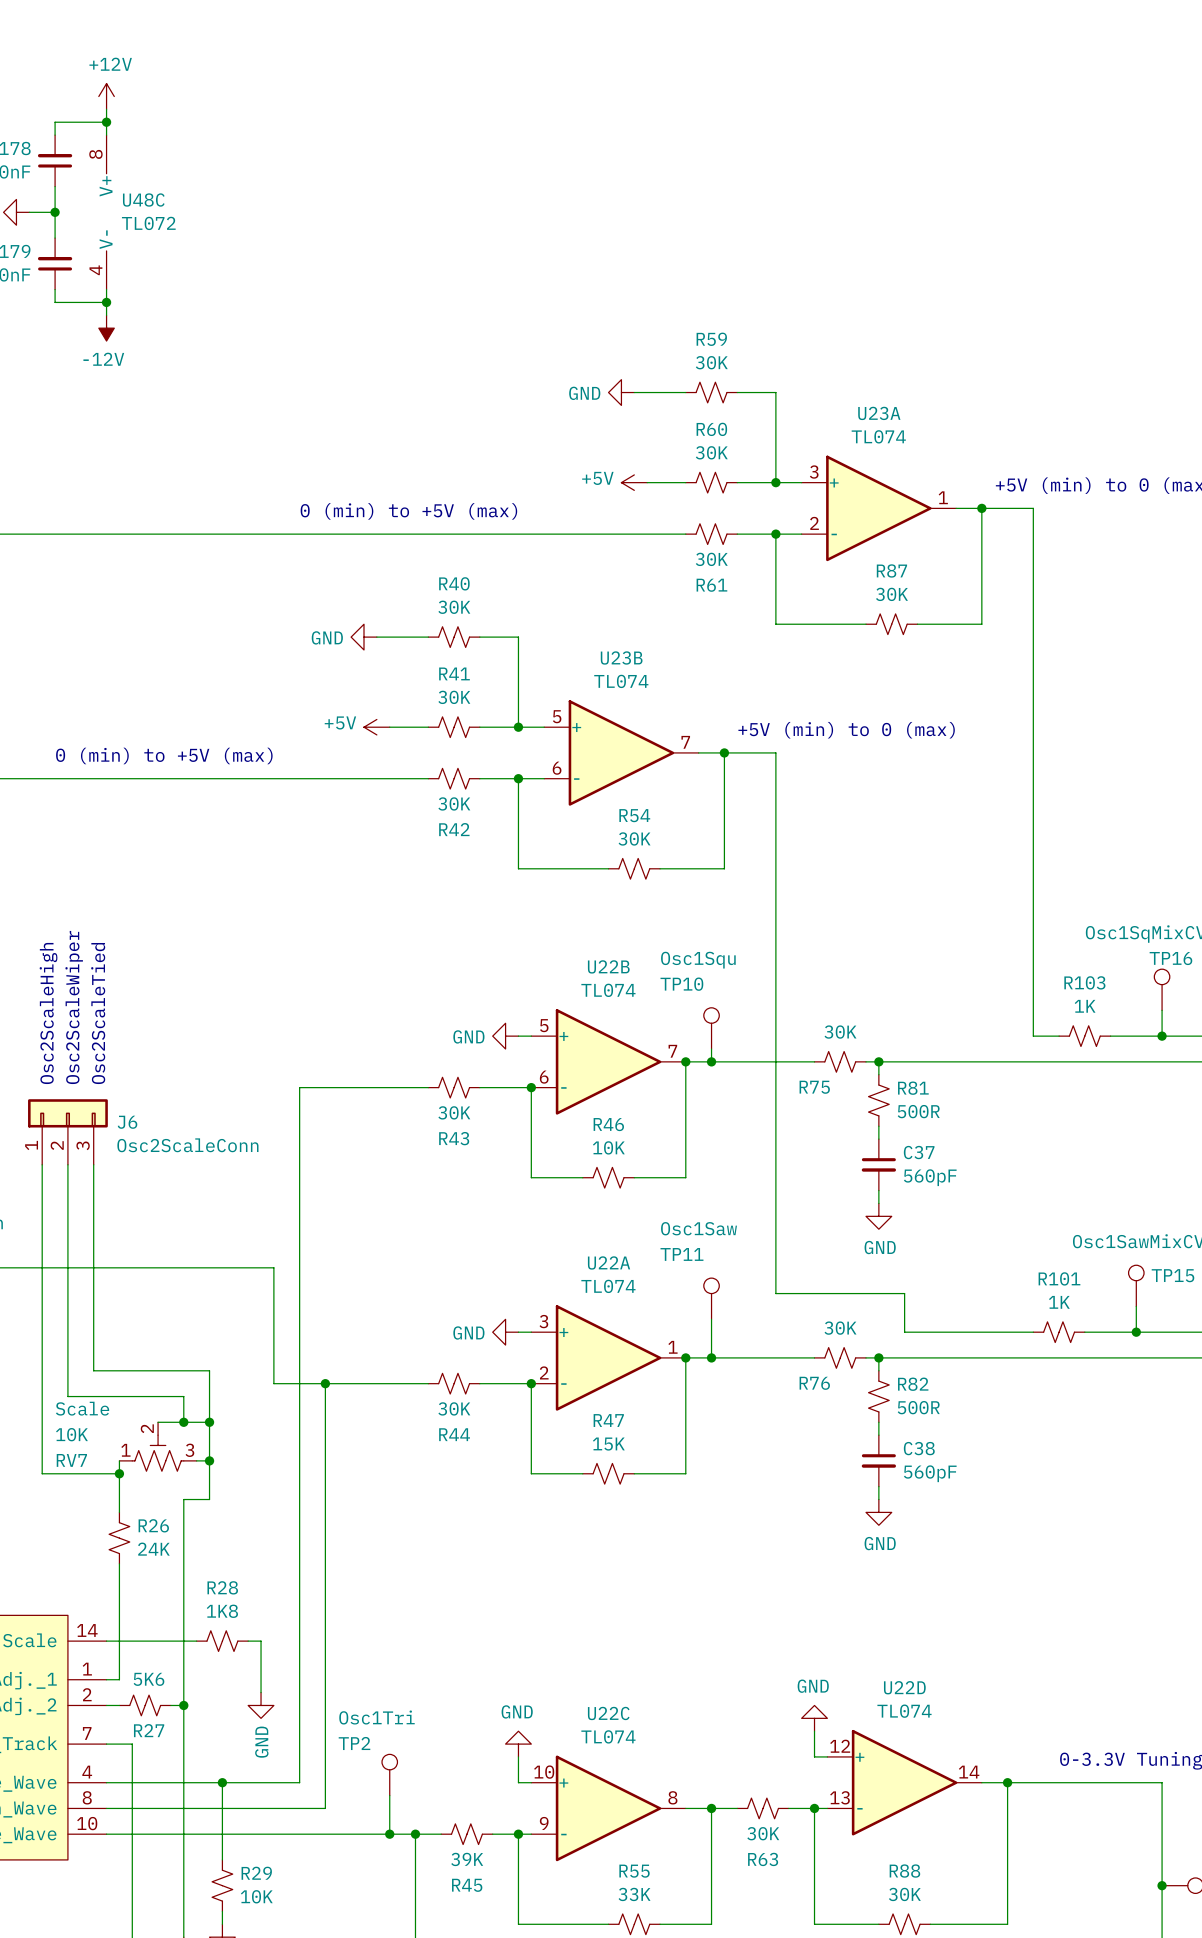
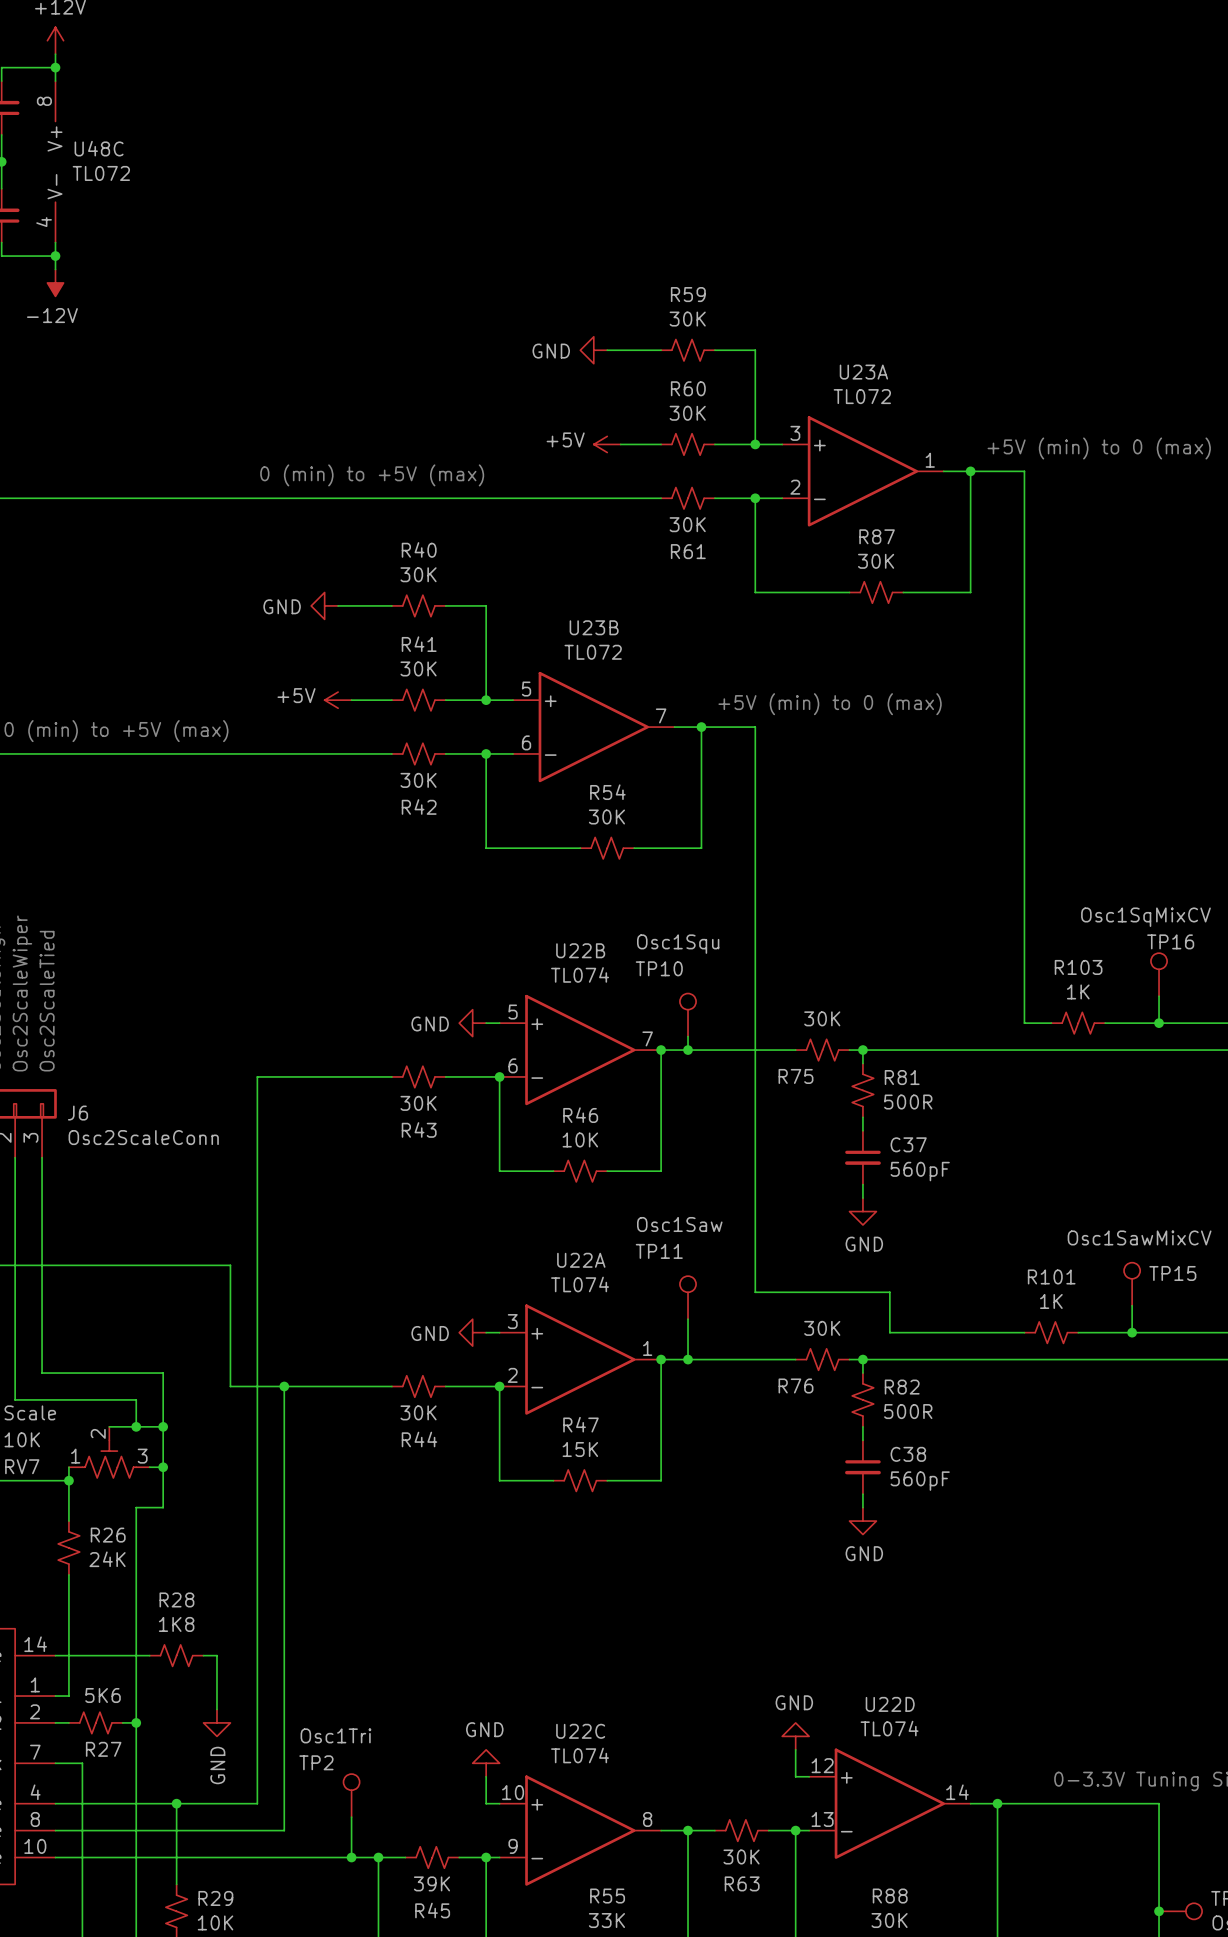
U23A value: TL074 (878, 436) -> TL072 (862, 396)
U23B value: TL074 (621, 681) -> TL072 (593, 652)

